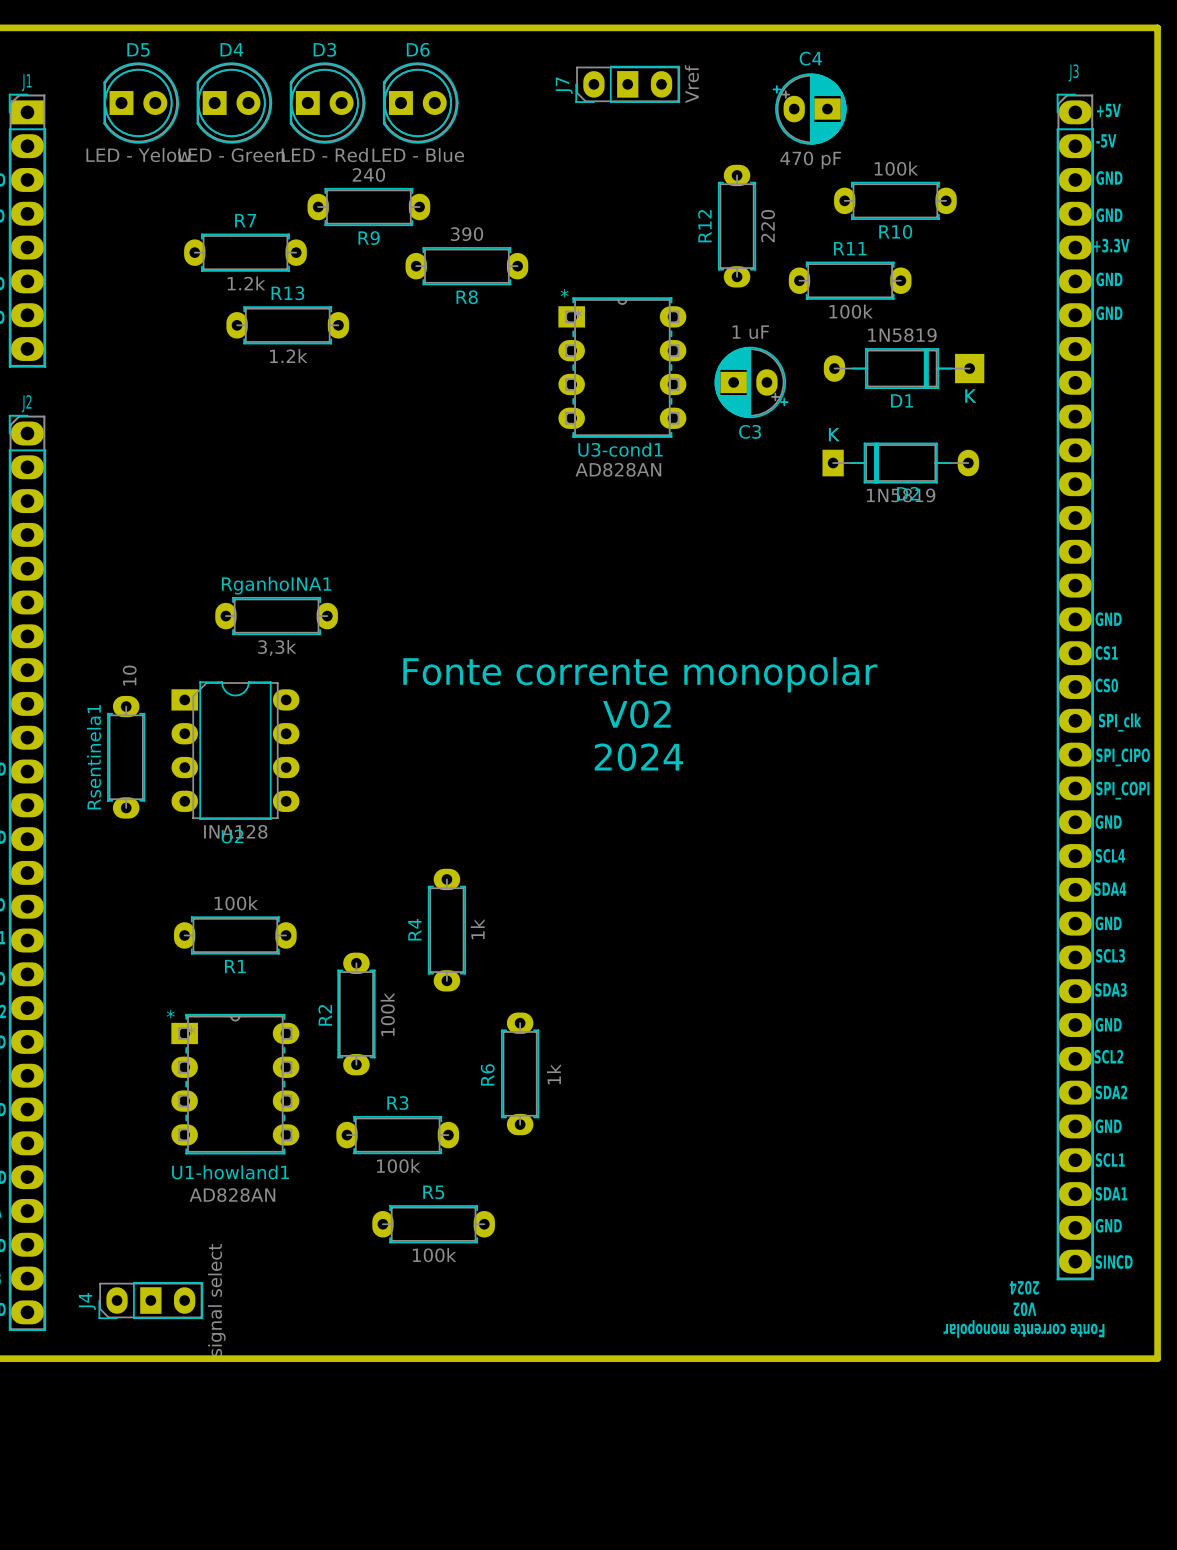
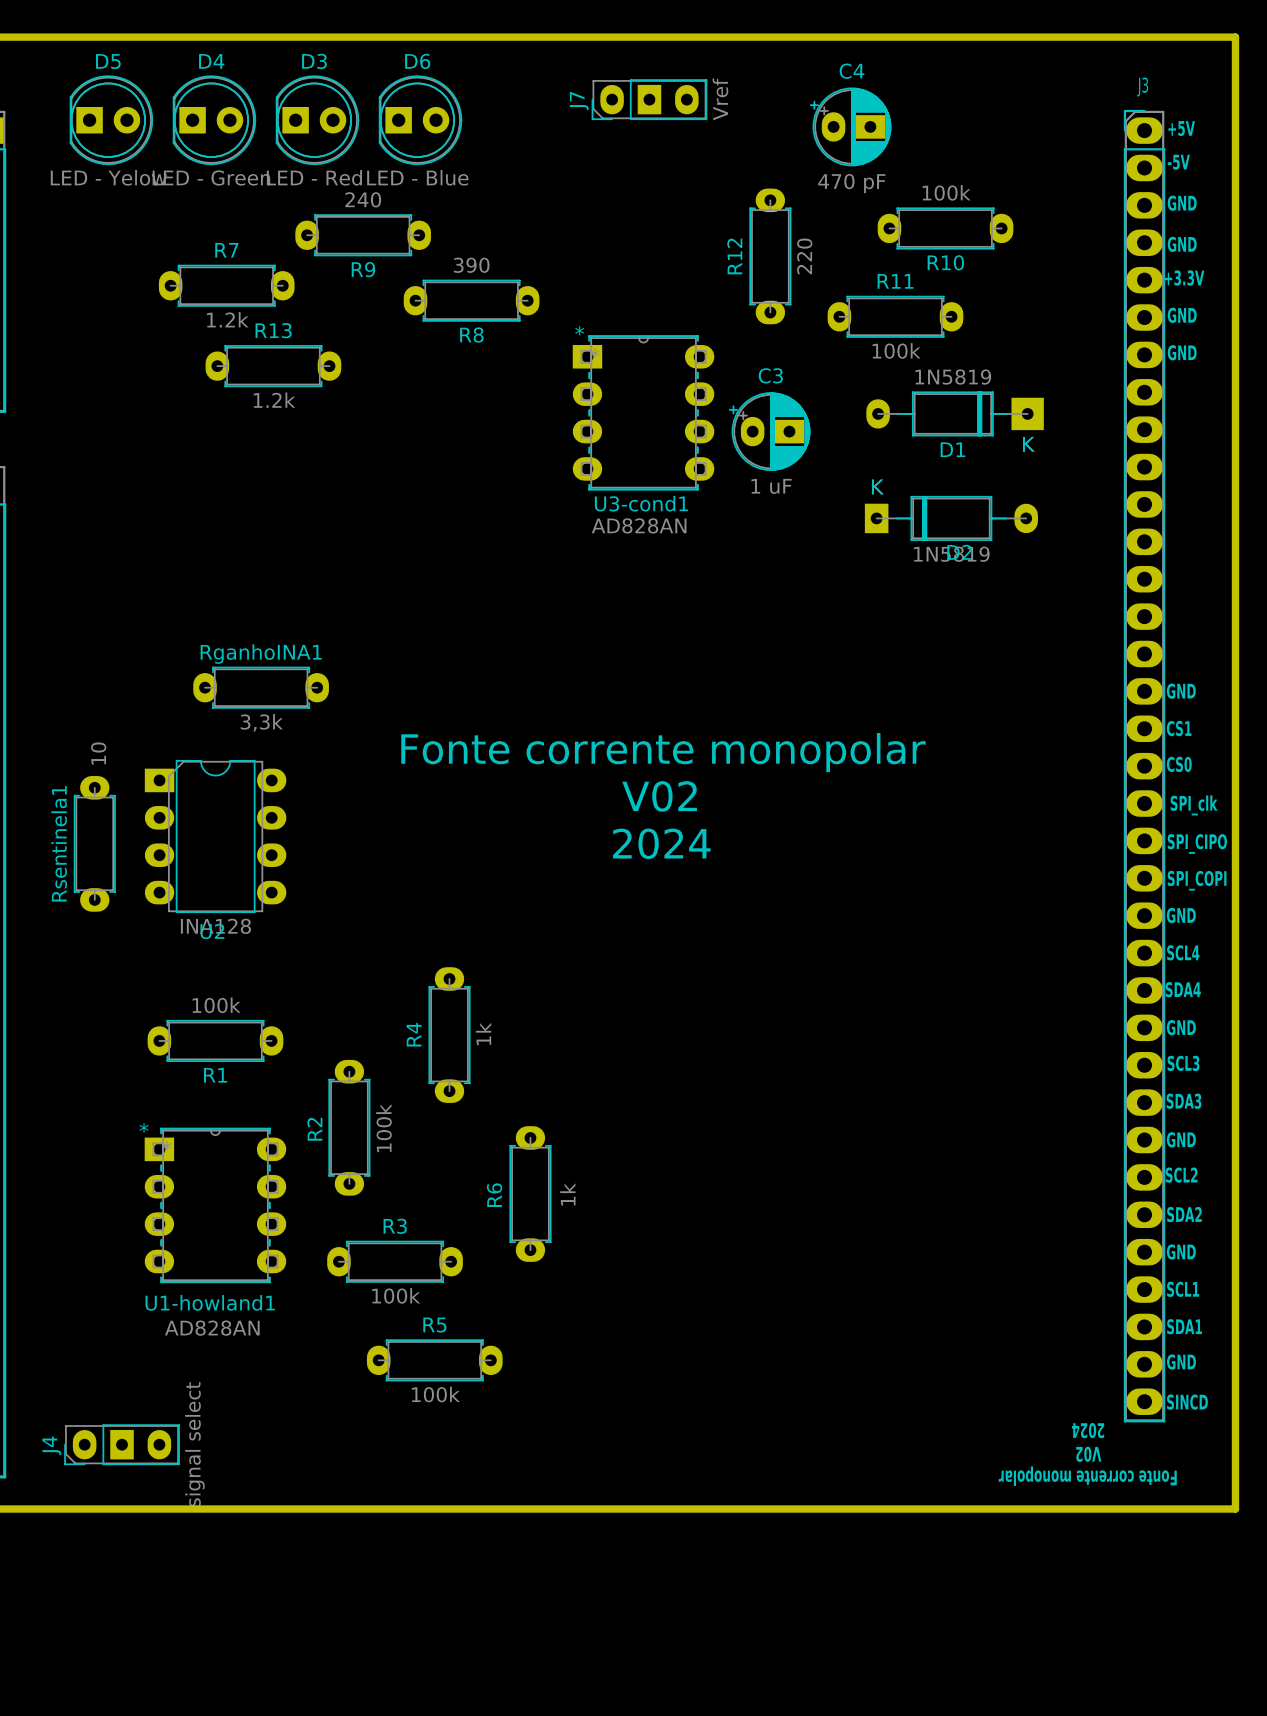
C3 rotation: 0° (751, 382) -> 180° (769, 431)

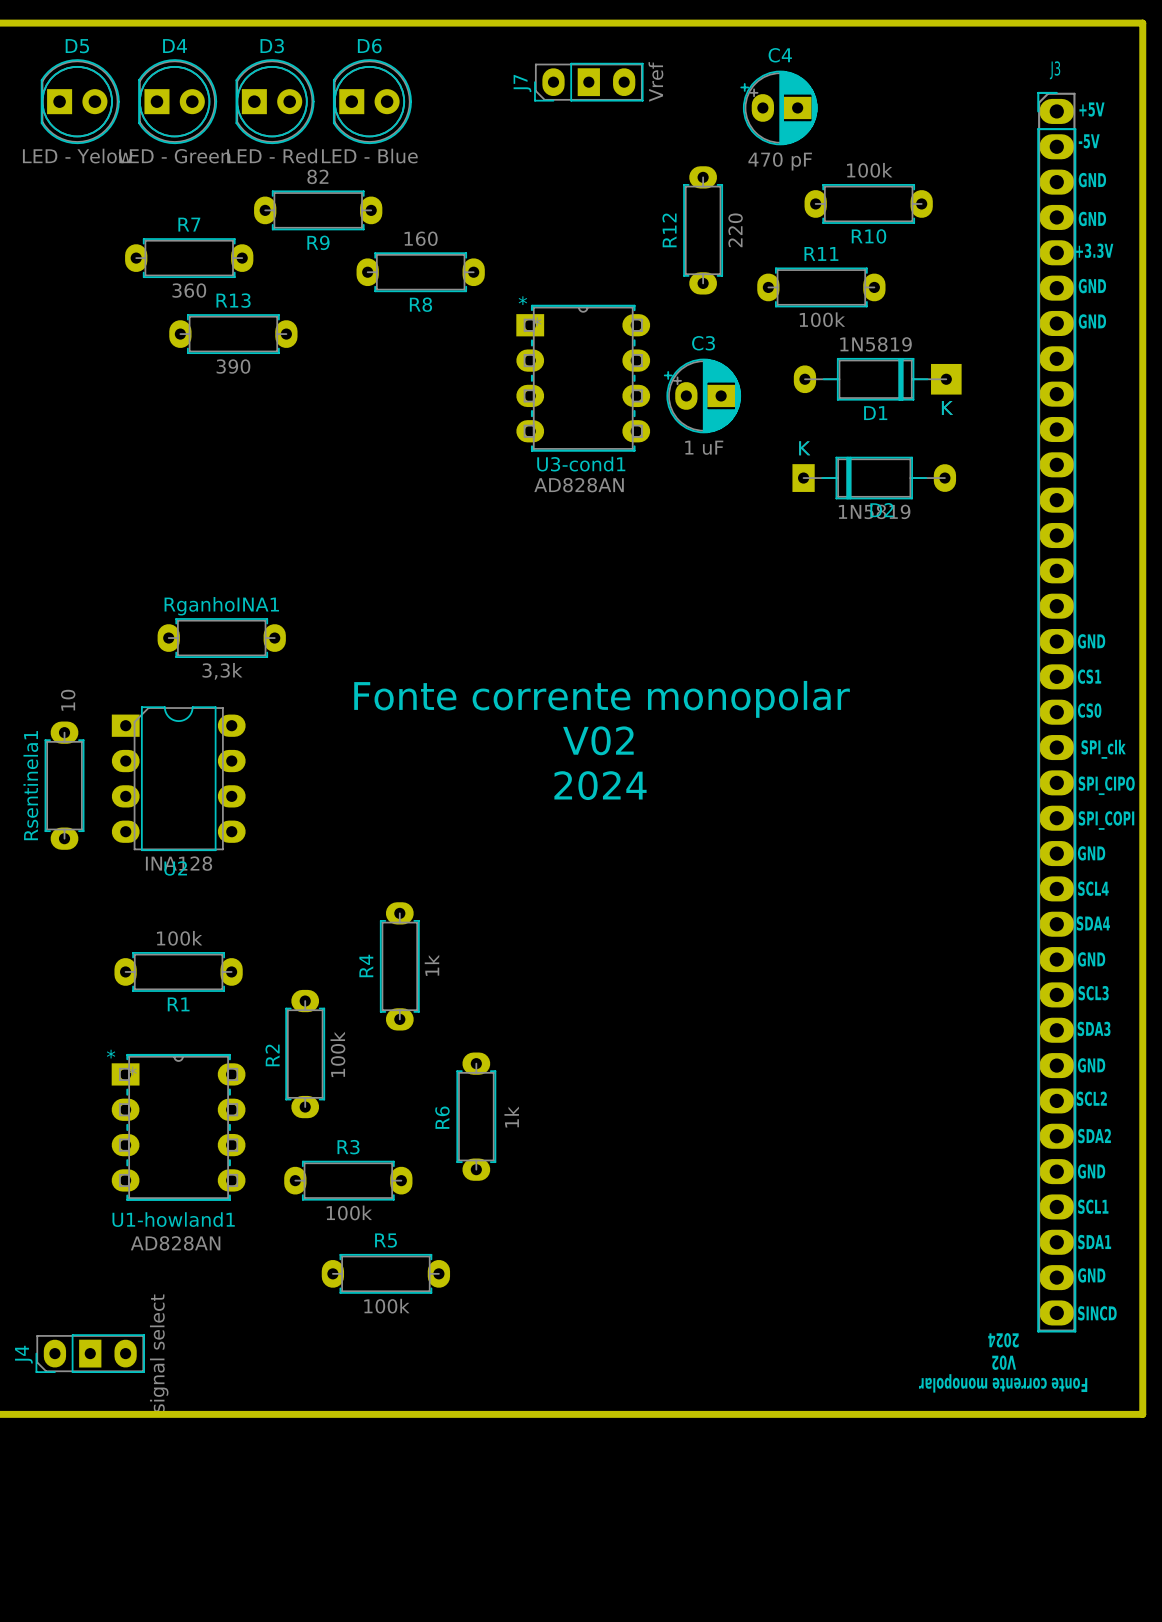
R9 value: 240 (363, 199) -> 82 (317, 176)
R8 value: 390 (471, 265) -> 160 (421, 238)
R7 value: 1.2k (227, 319) -> 360 (189, 290)
R13 value: 1.2k (274, 400) -> 390 (233, 366)

